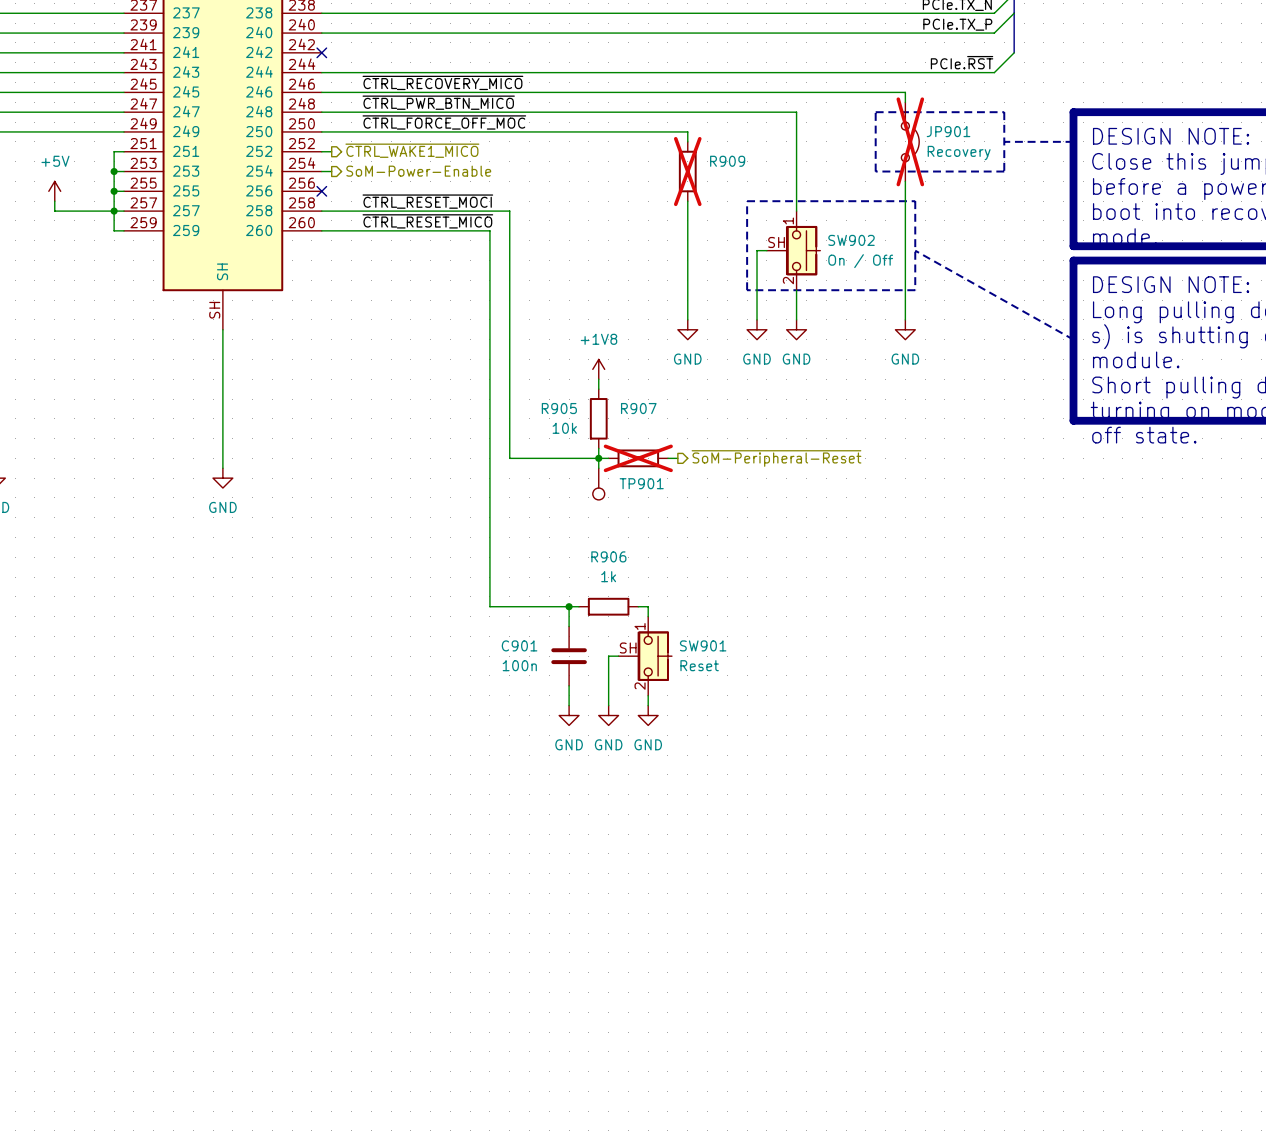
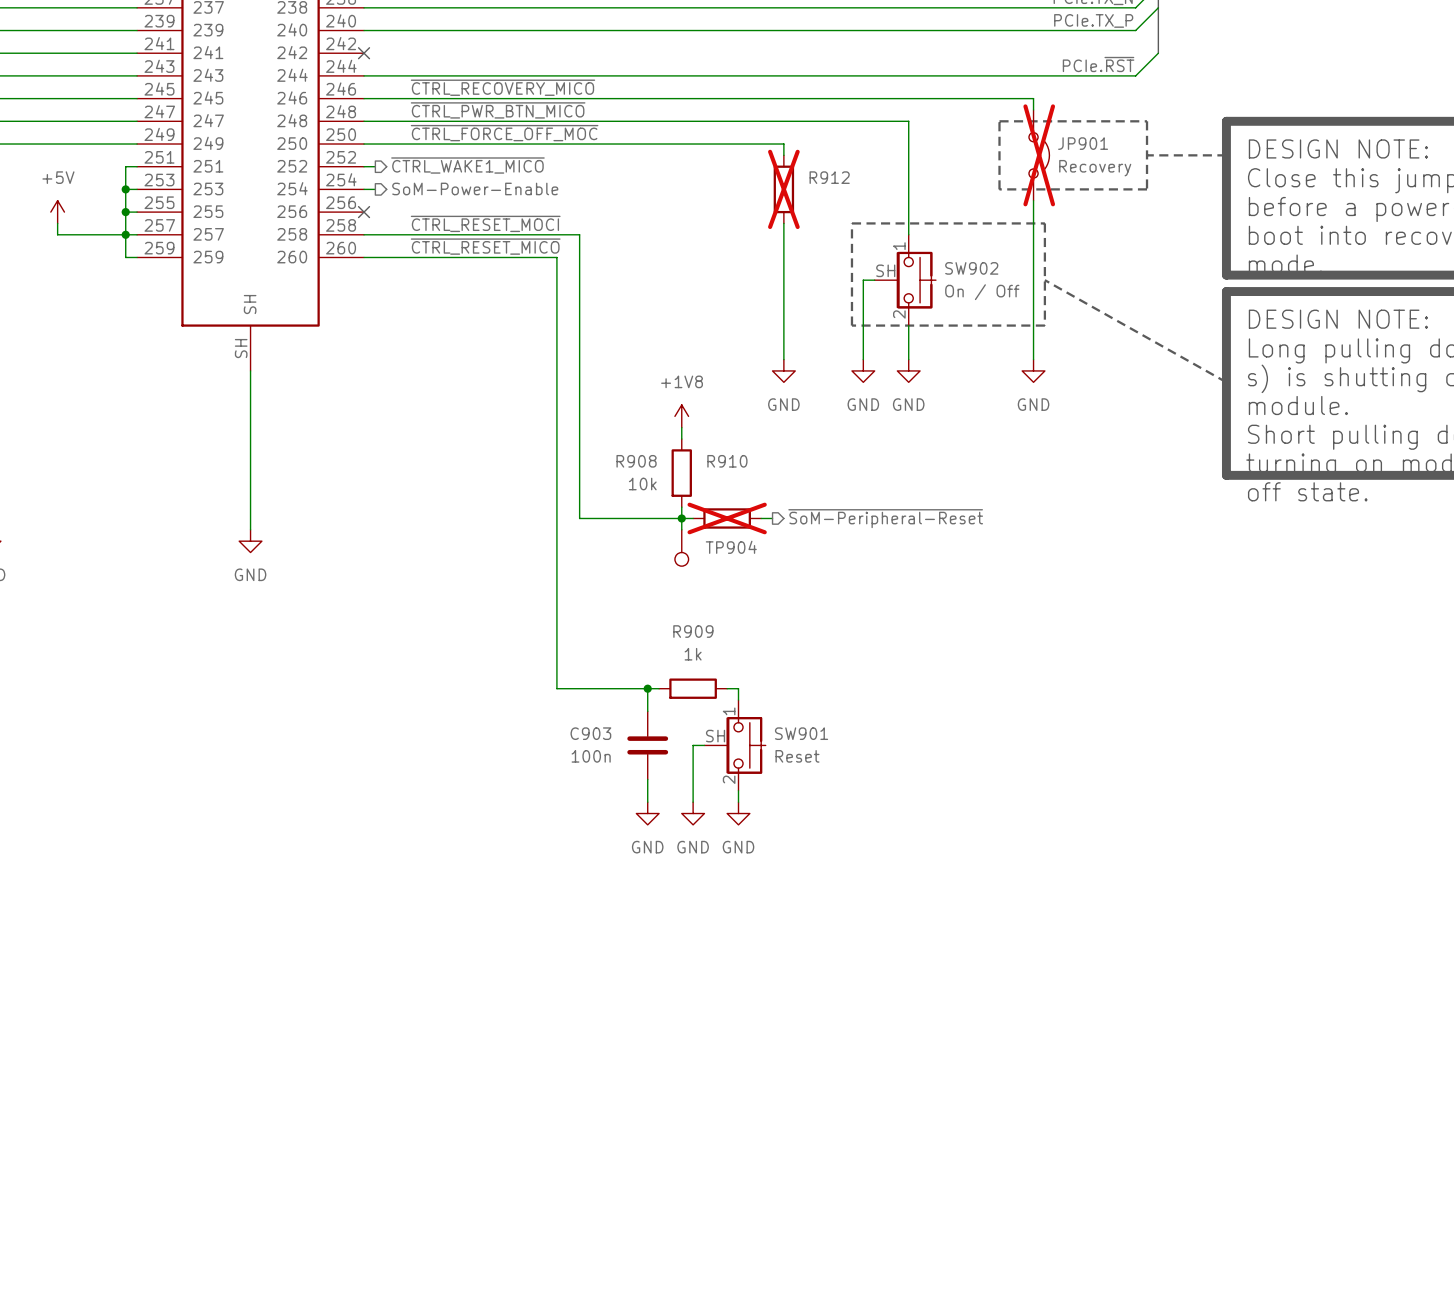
R909 name: R909 (727, 161) -> R912 (829, 177)
R905 name: R905 (559, 408) -> R908 (636, 461)
R907 name: R907 (638, 408) -> R910 (727, 461)
TP901 name: TP901 (641, 483) -> TP904 (731, 547)
R906 name: R906 (608, 556) -> R909 (693, 631)
C901 name: C901 (519, 645) -> C903 (590, 733)

